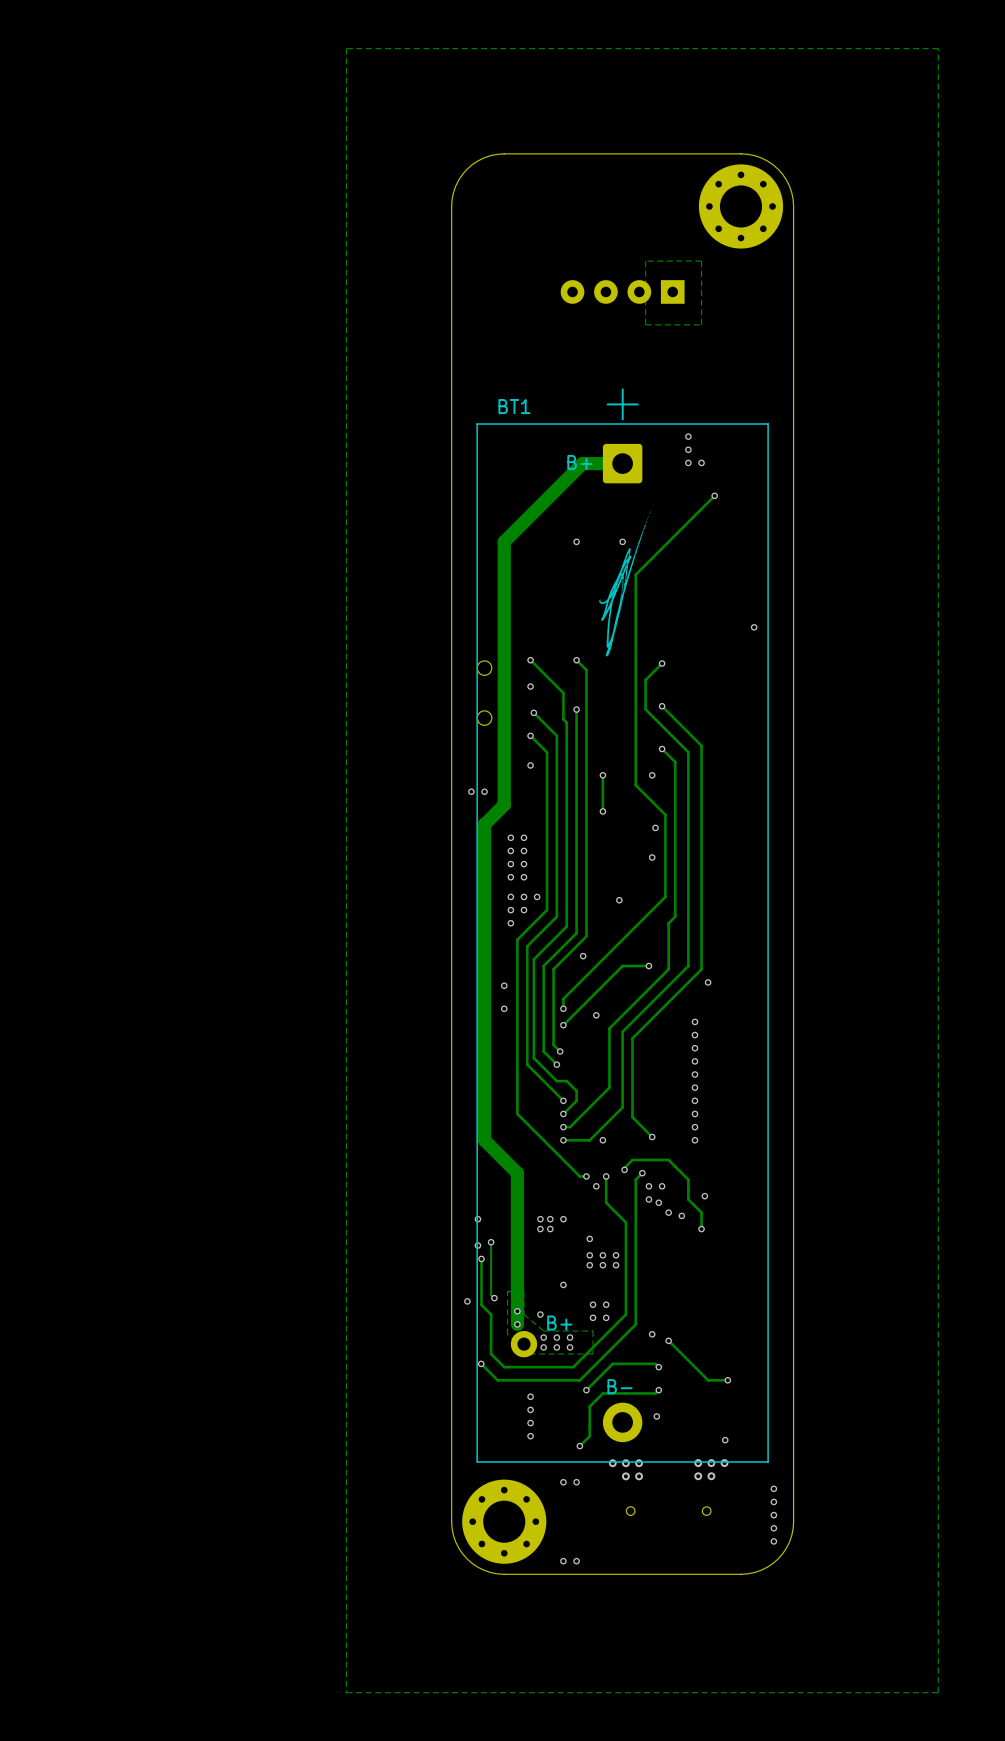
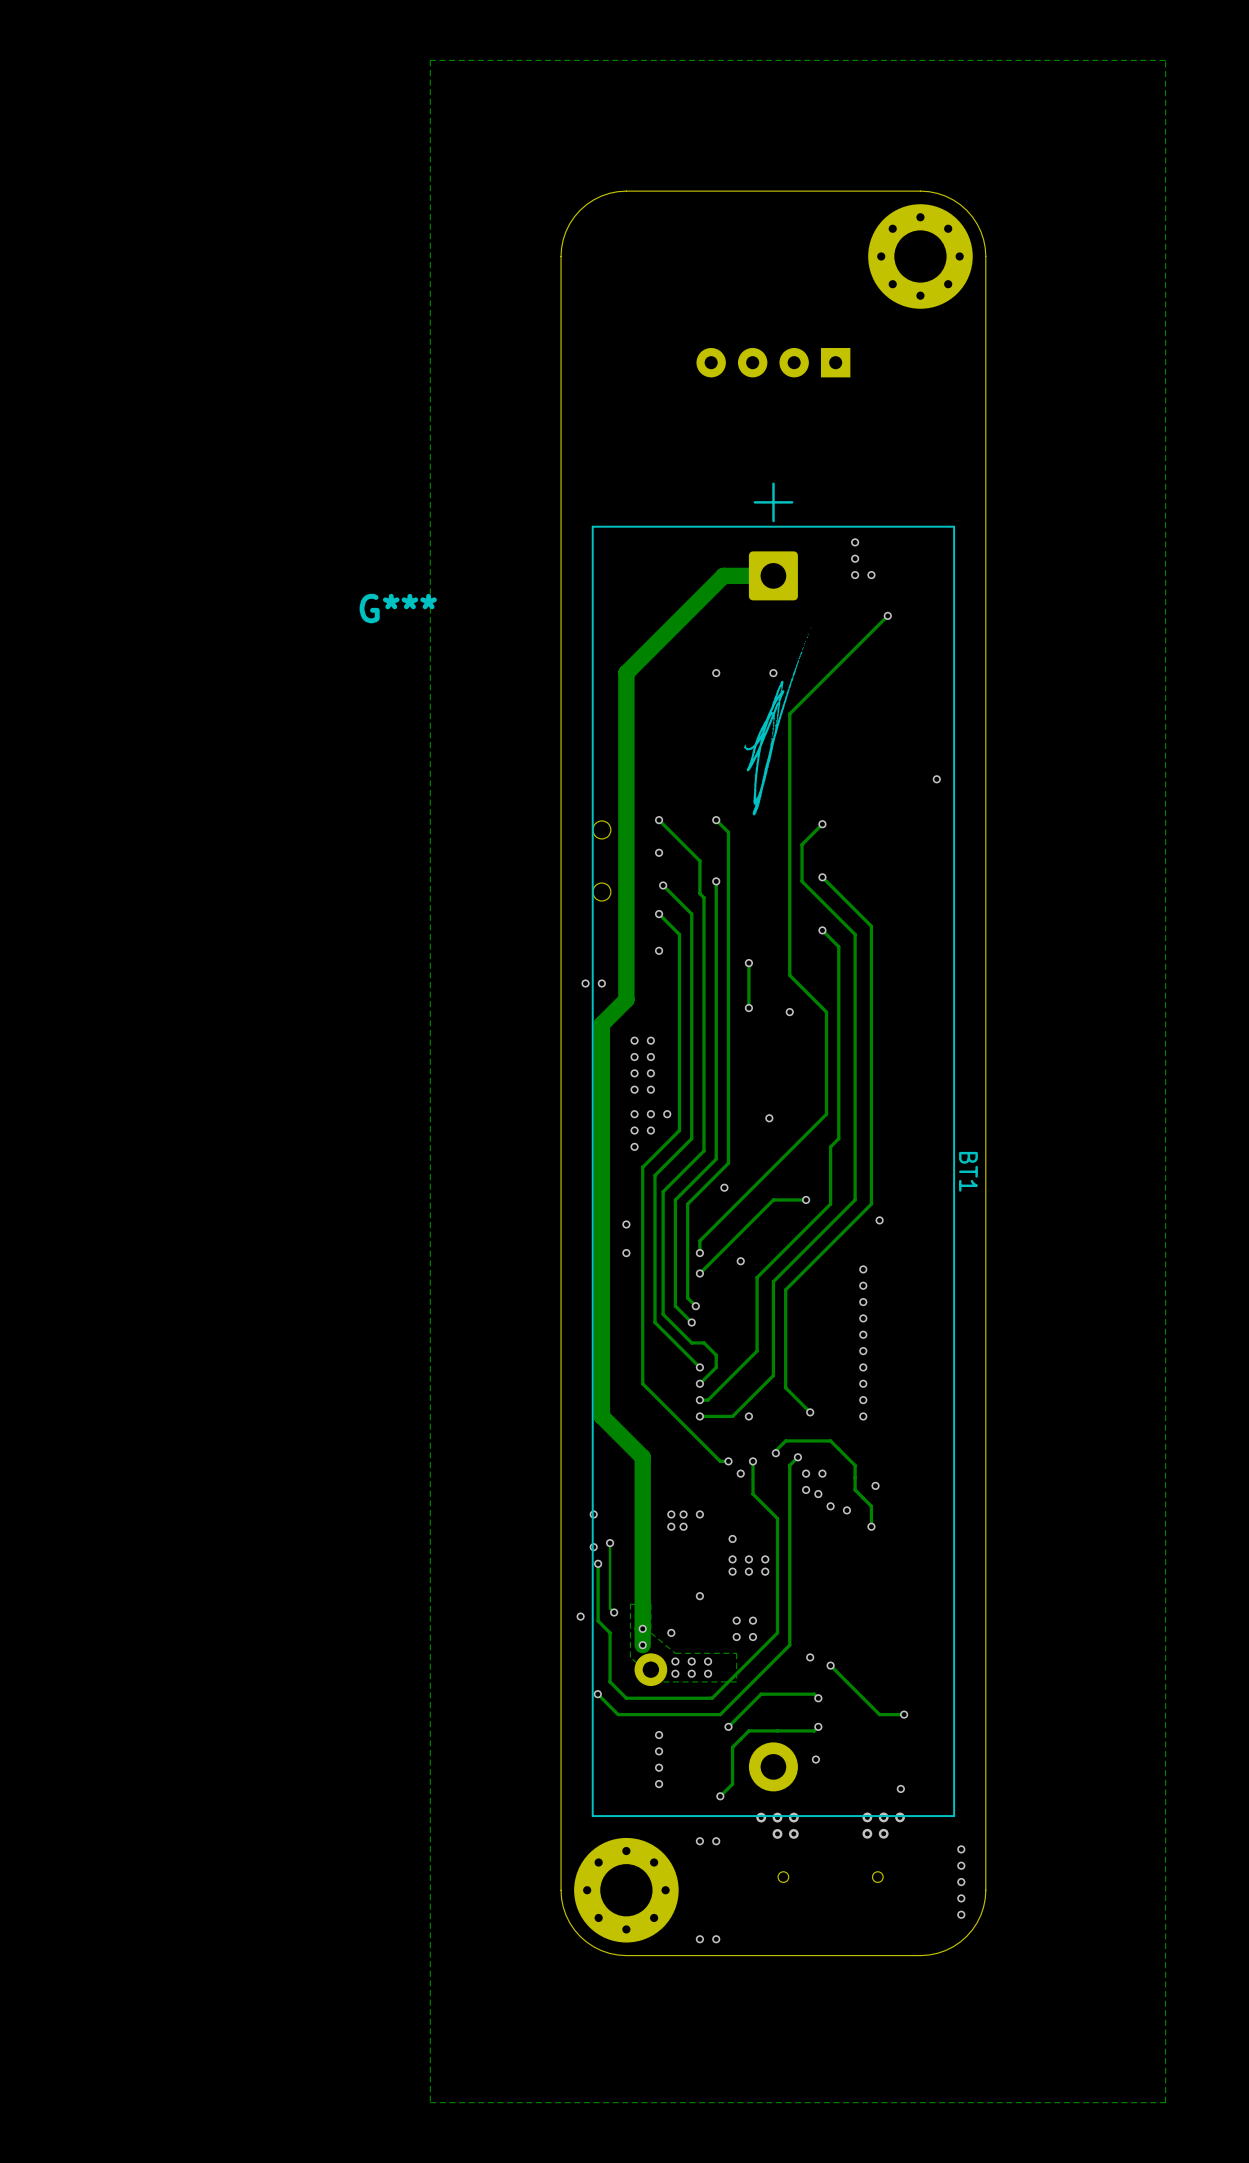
zone outline: (701, 261) (645, 261) (645, 324) (701, 324) (701, 261) -> none
BT1 name rotation: 0° (514, 406) -> 90° clockwise (968, 1171)
BT1 name position: BT1 (514, 406) -> BT1 (968, 1171)
text: B+ (579, 462) -> none
G***: none -> (777, 740)
via: (652, 775) -> none
via: none -> (789, 1012)
via: (655, 827) -> none
via: (652, 857) -> none
text: B+ (559, 1323) -> none
text: B- (619, 1386) -> none

